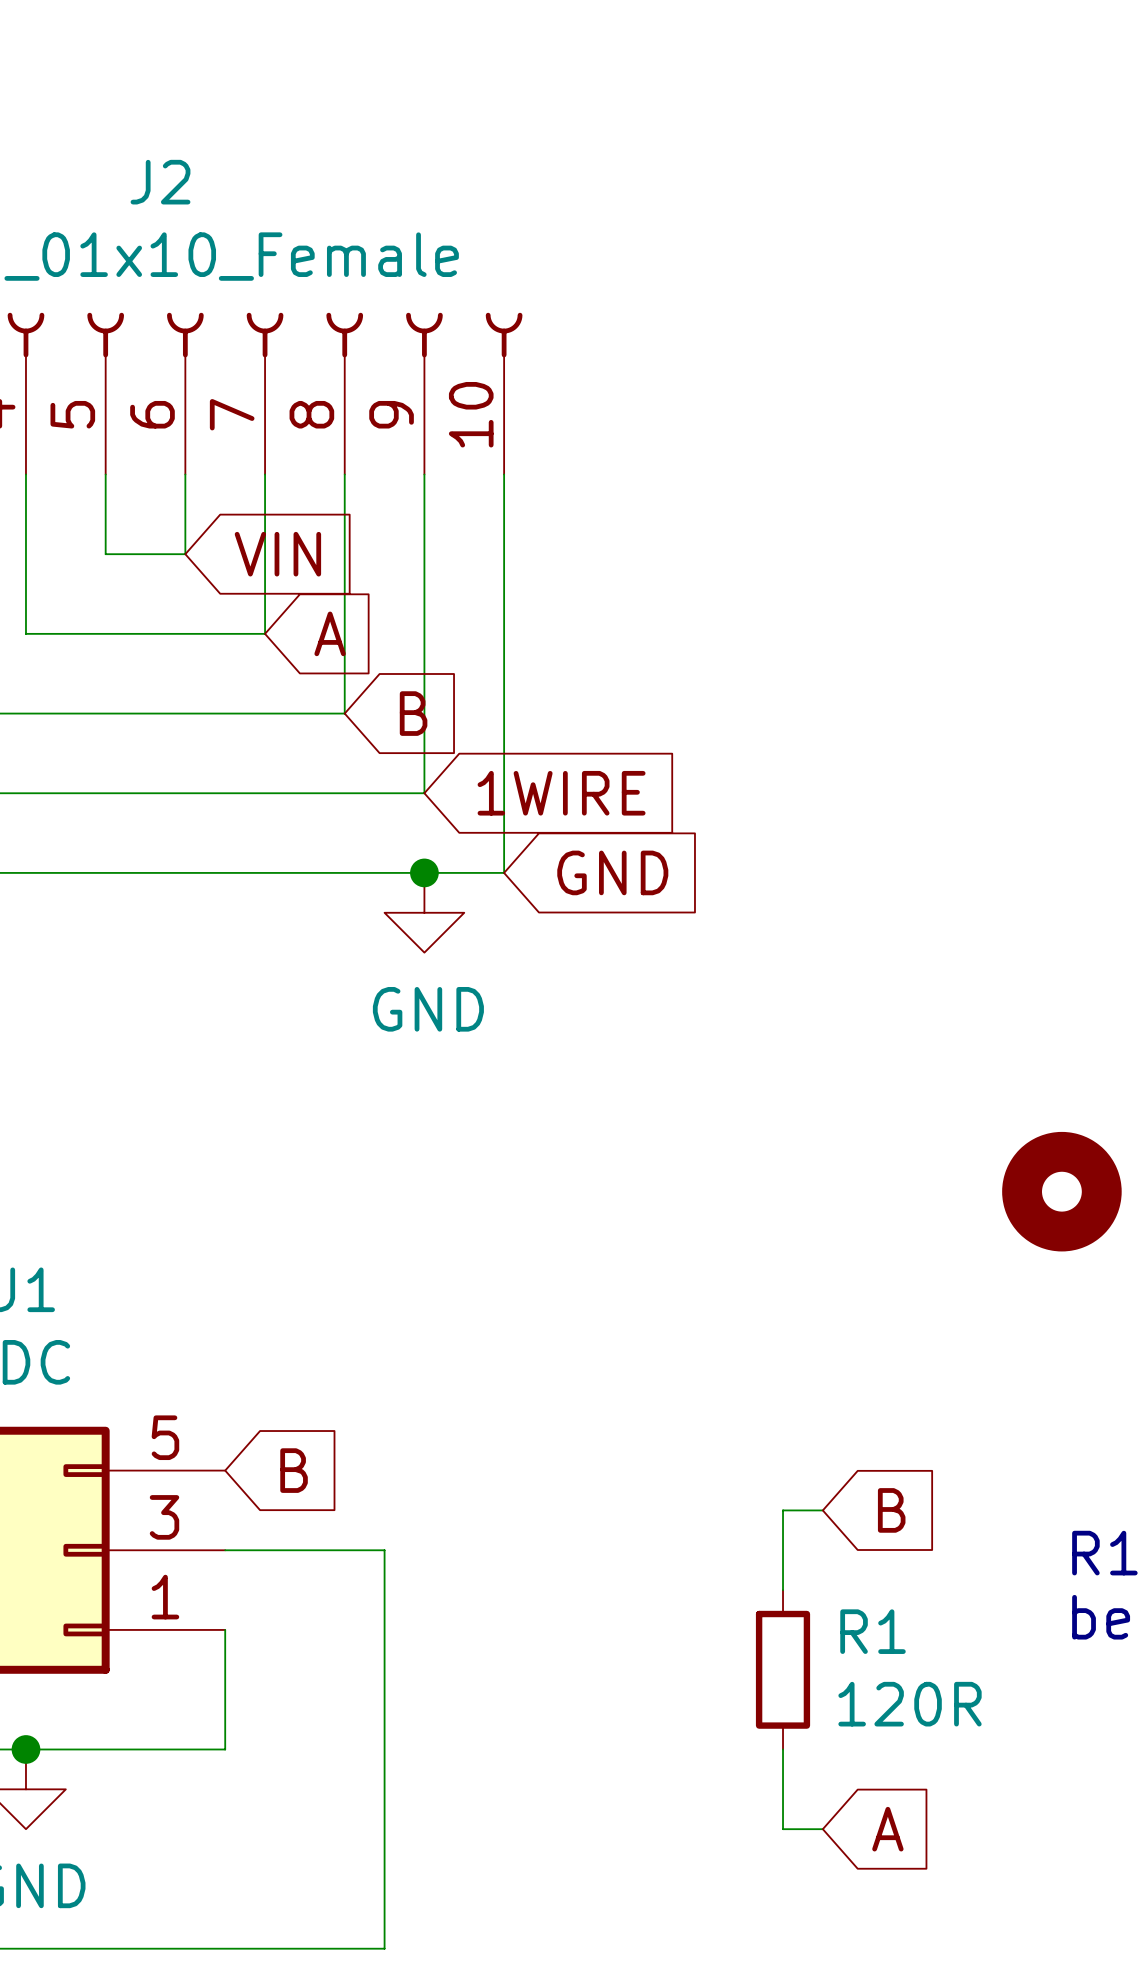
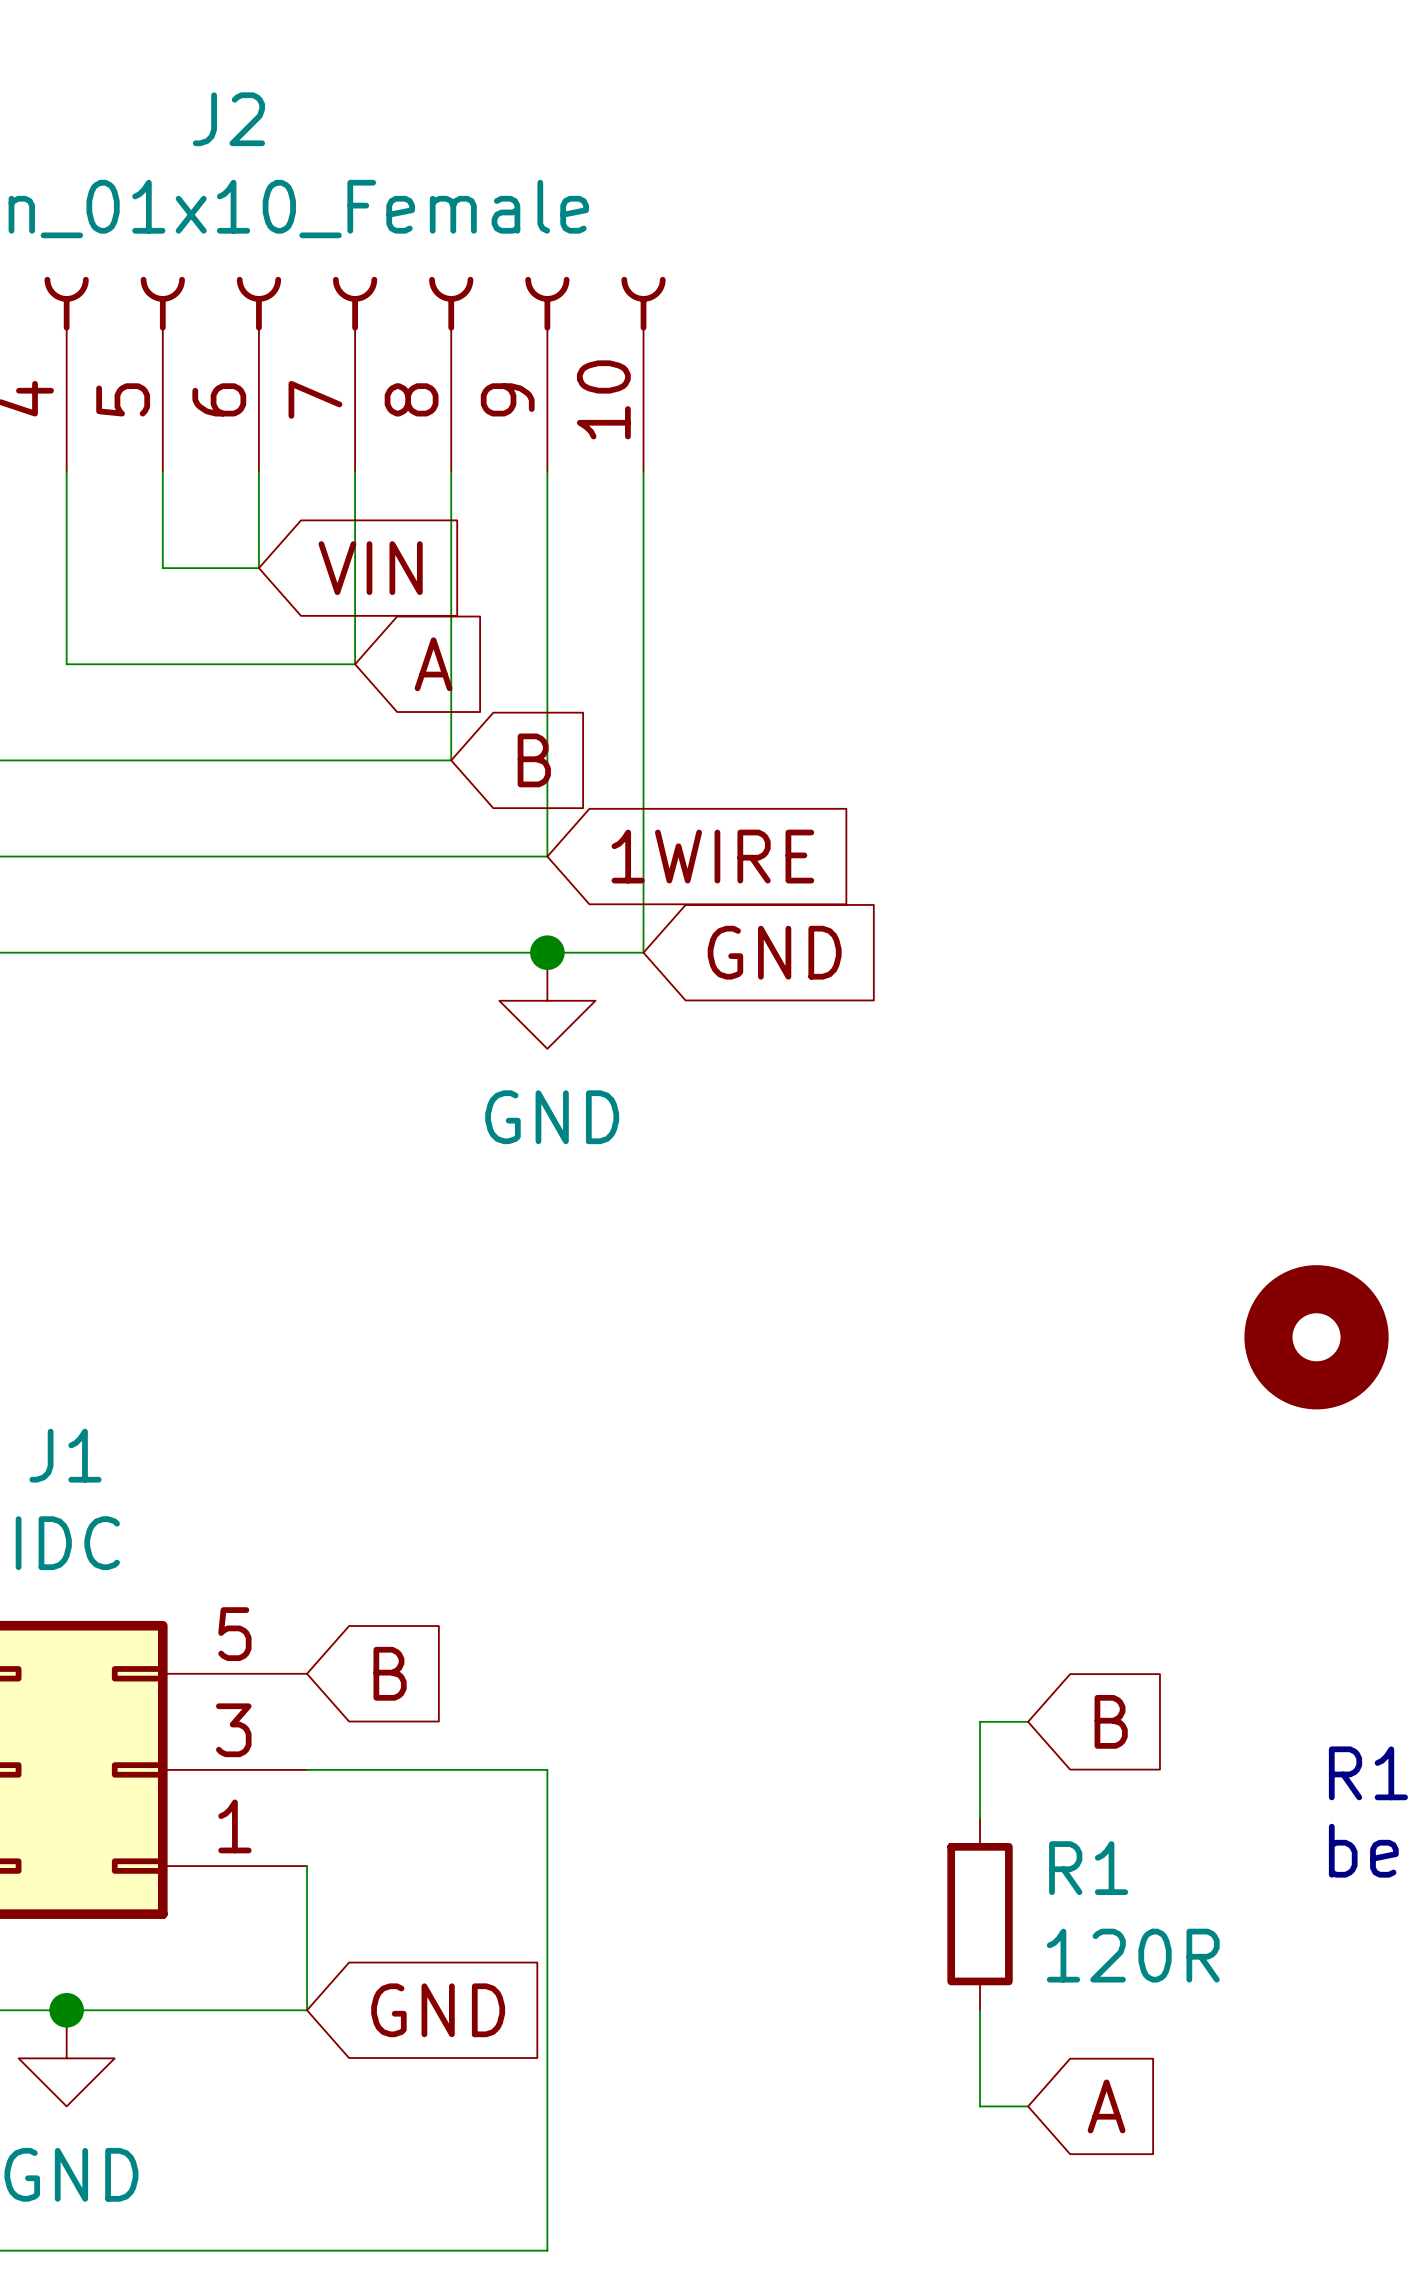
wire: (384, 1550) (384, 1948) -> (499, 1769) (547, 1769) (547, 2250) (499, 2250)
global label: none -> GND (438, 2010)

